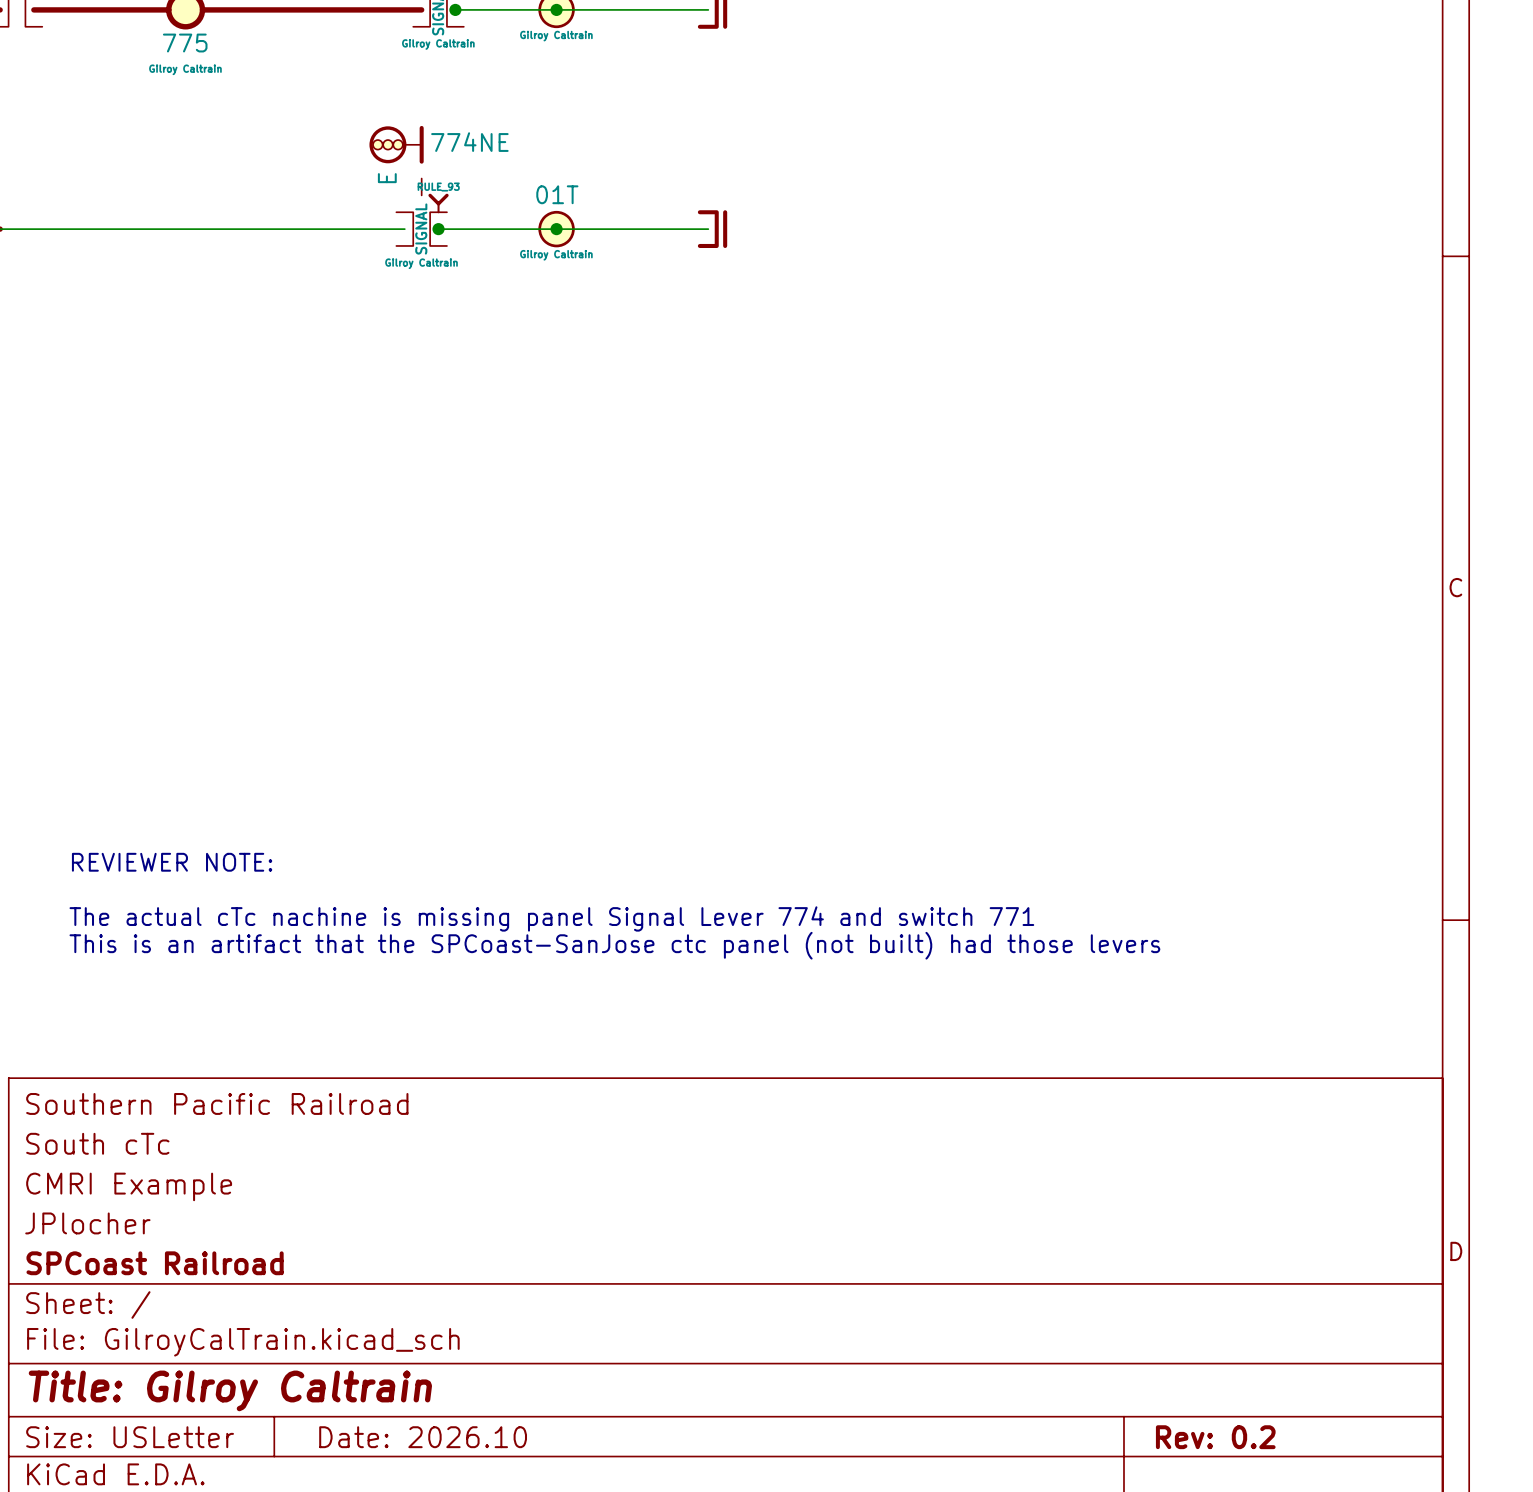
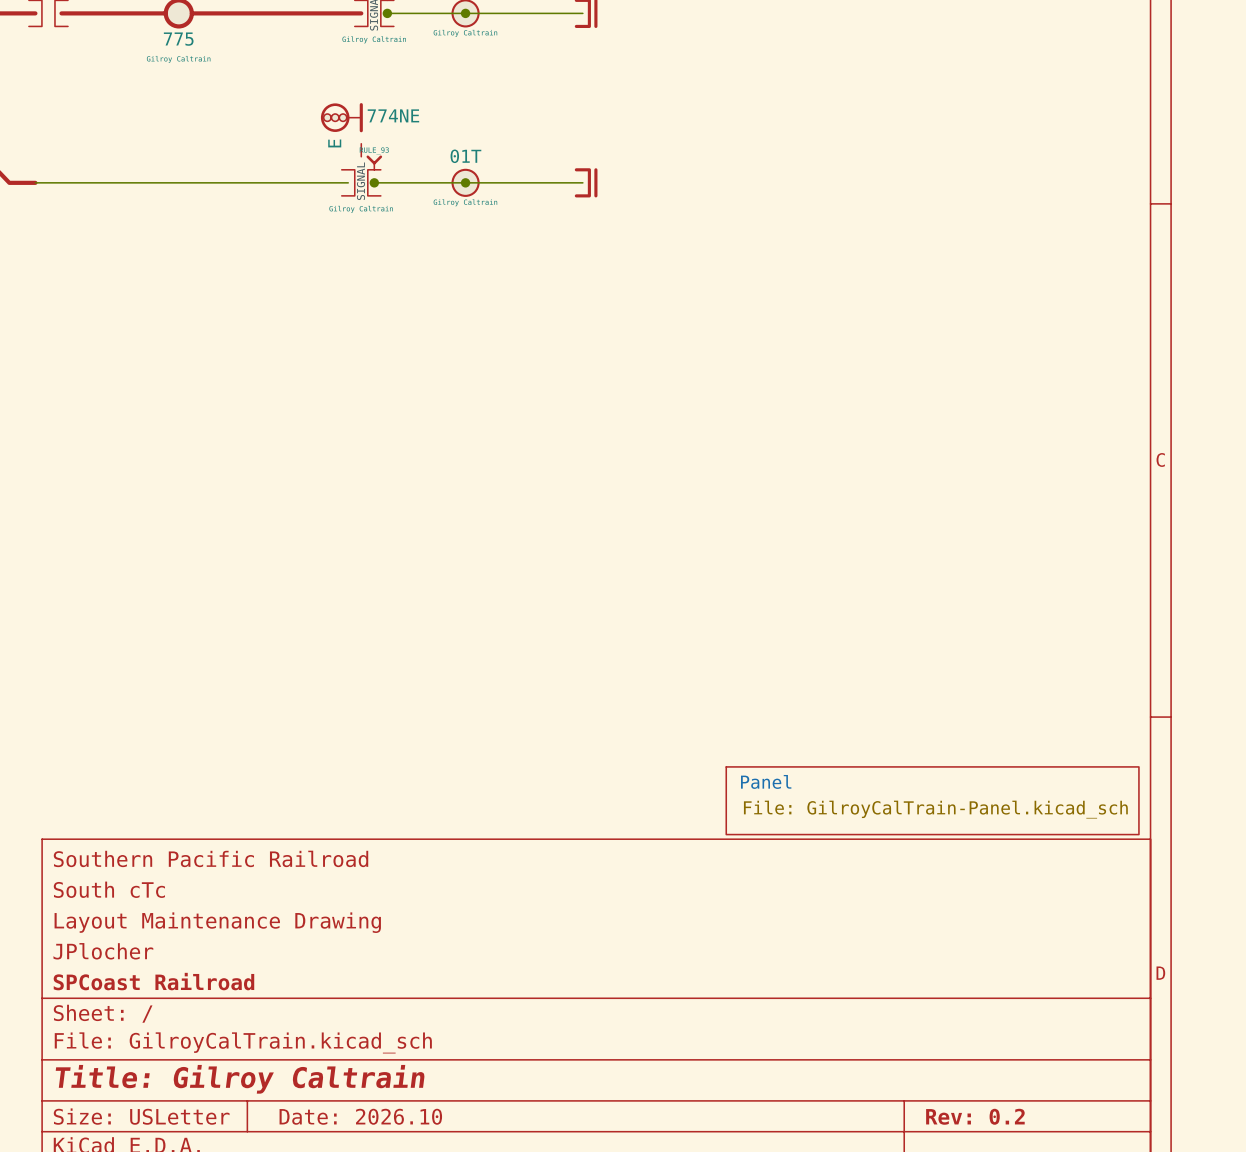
text: REVIEWER NOTE: (172, 862) -> none
text: The actual cTc nachine is missing panel Signal Lever 774 and switch 771 (551, 918) -> none
text: This is an artifact that the SPCoast-SanJose ctc panel (not built) had those levers (614, 945) -> none
sheet Panel: none -> File: GilroyCalTrain-Panel.kicad_sch (932, 800)
title block: CMRI Example (129, 1186) -> Layout Maintenance Drawing (217, 922)

